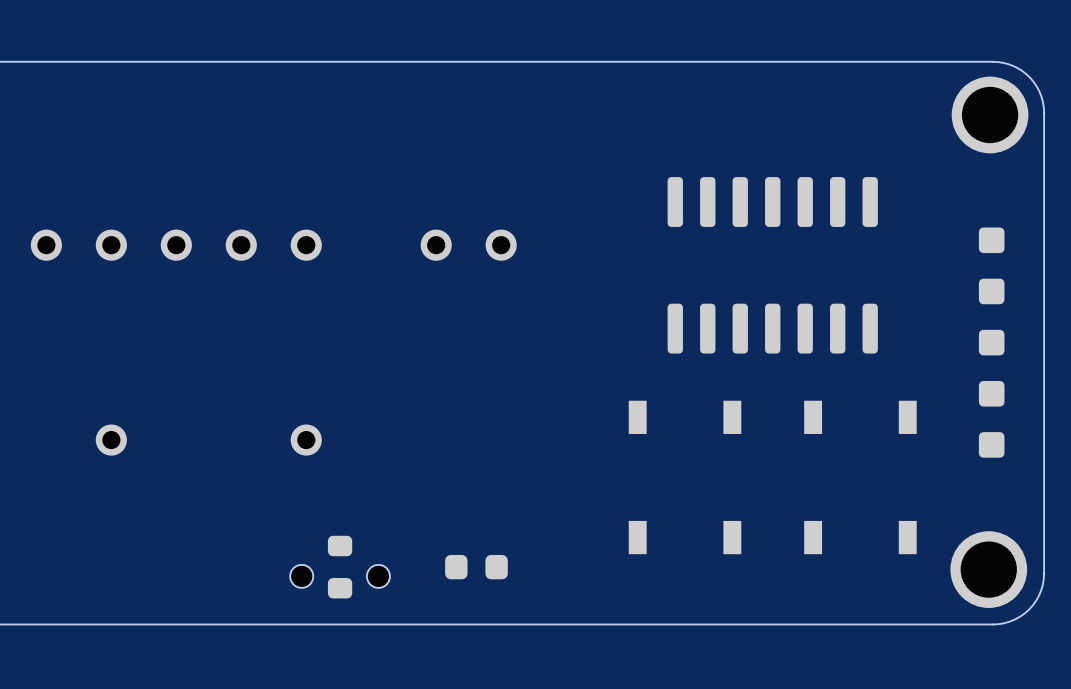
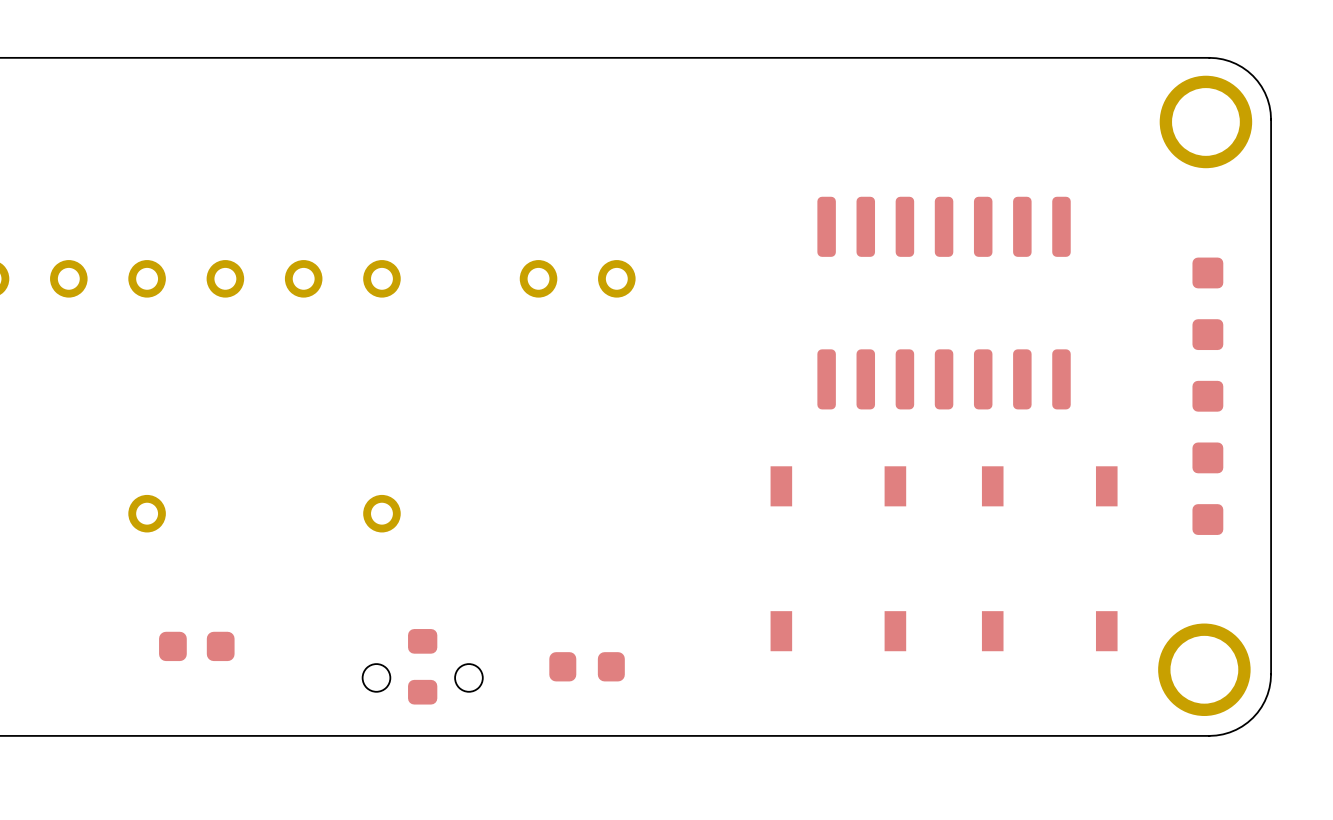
part: none -> (196, 646)

